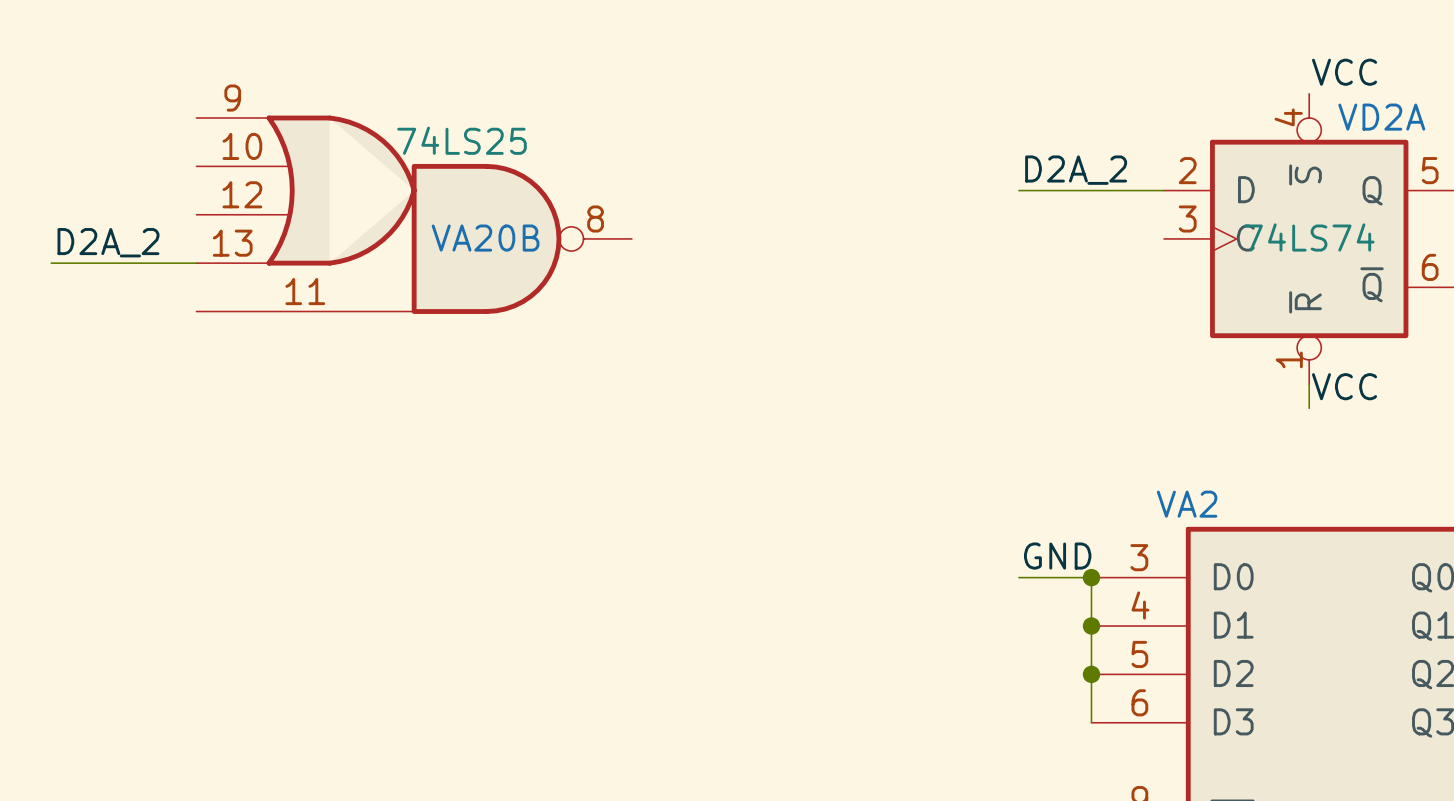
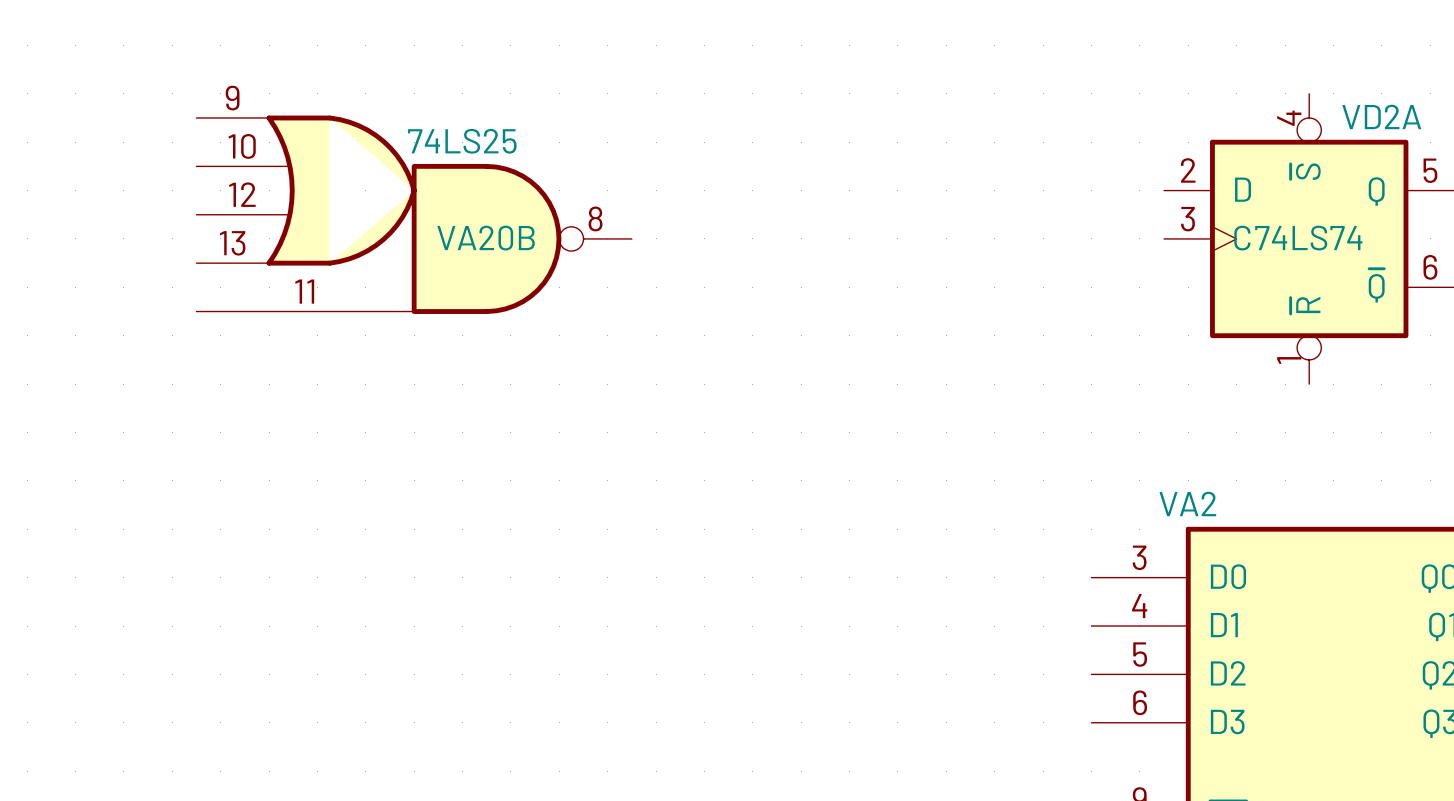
label: VCC (1344, 72) -> none
label: D2A_2 (1076, 170) -> none
wire: (1018, 190) (1164, 190) -> none
label: D2A_2 (108, 242) -> none
wire: (51, 263) (196, 263) -> none
wire: (1309, 384) (1309, 408) -> none
label: VCC (1344, 386) -> none
label: GND (1057, 556) -> none
wire: (1018, 577) (1091, 577) (1091, 722) -> none
junction: (1091, 577) -> none
junction: (1091, 626) -> none
junction: (1091, 674) -> none

